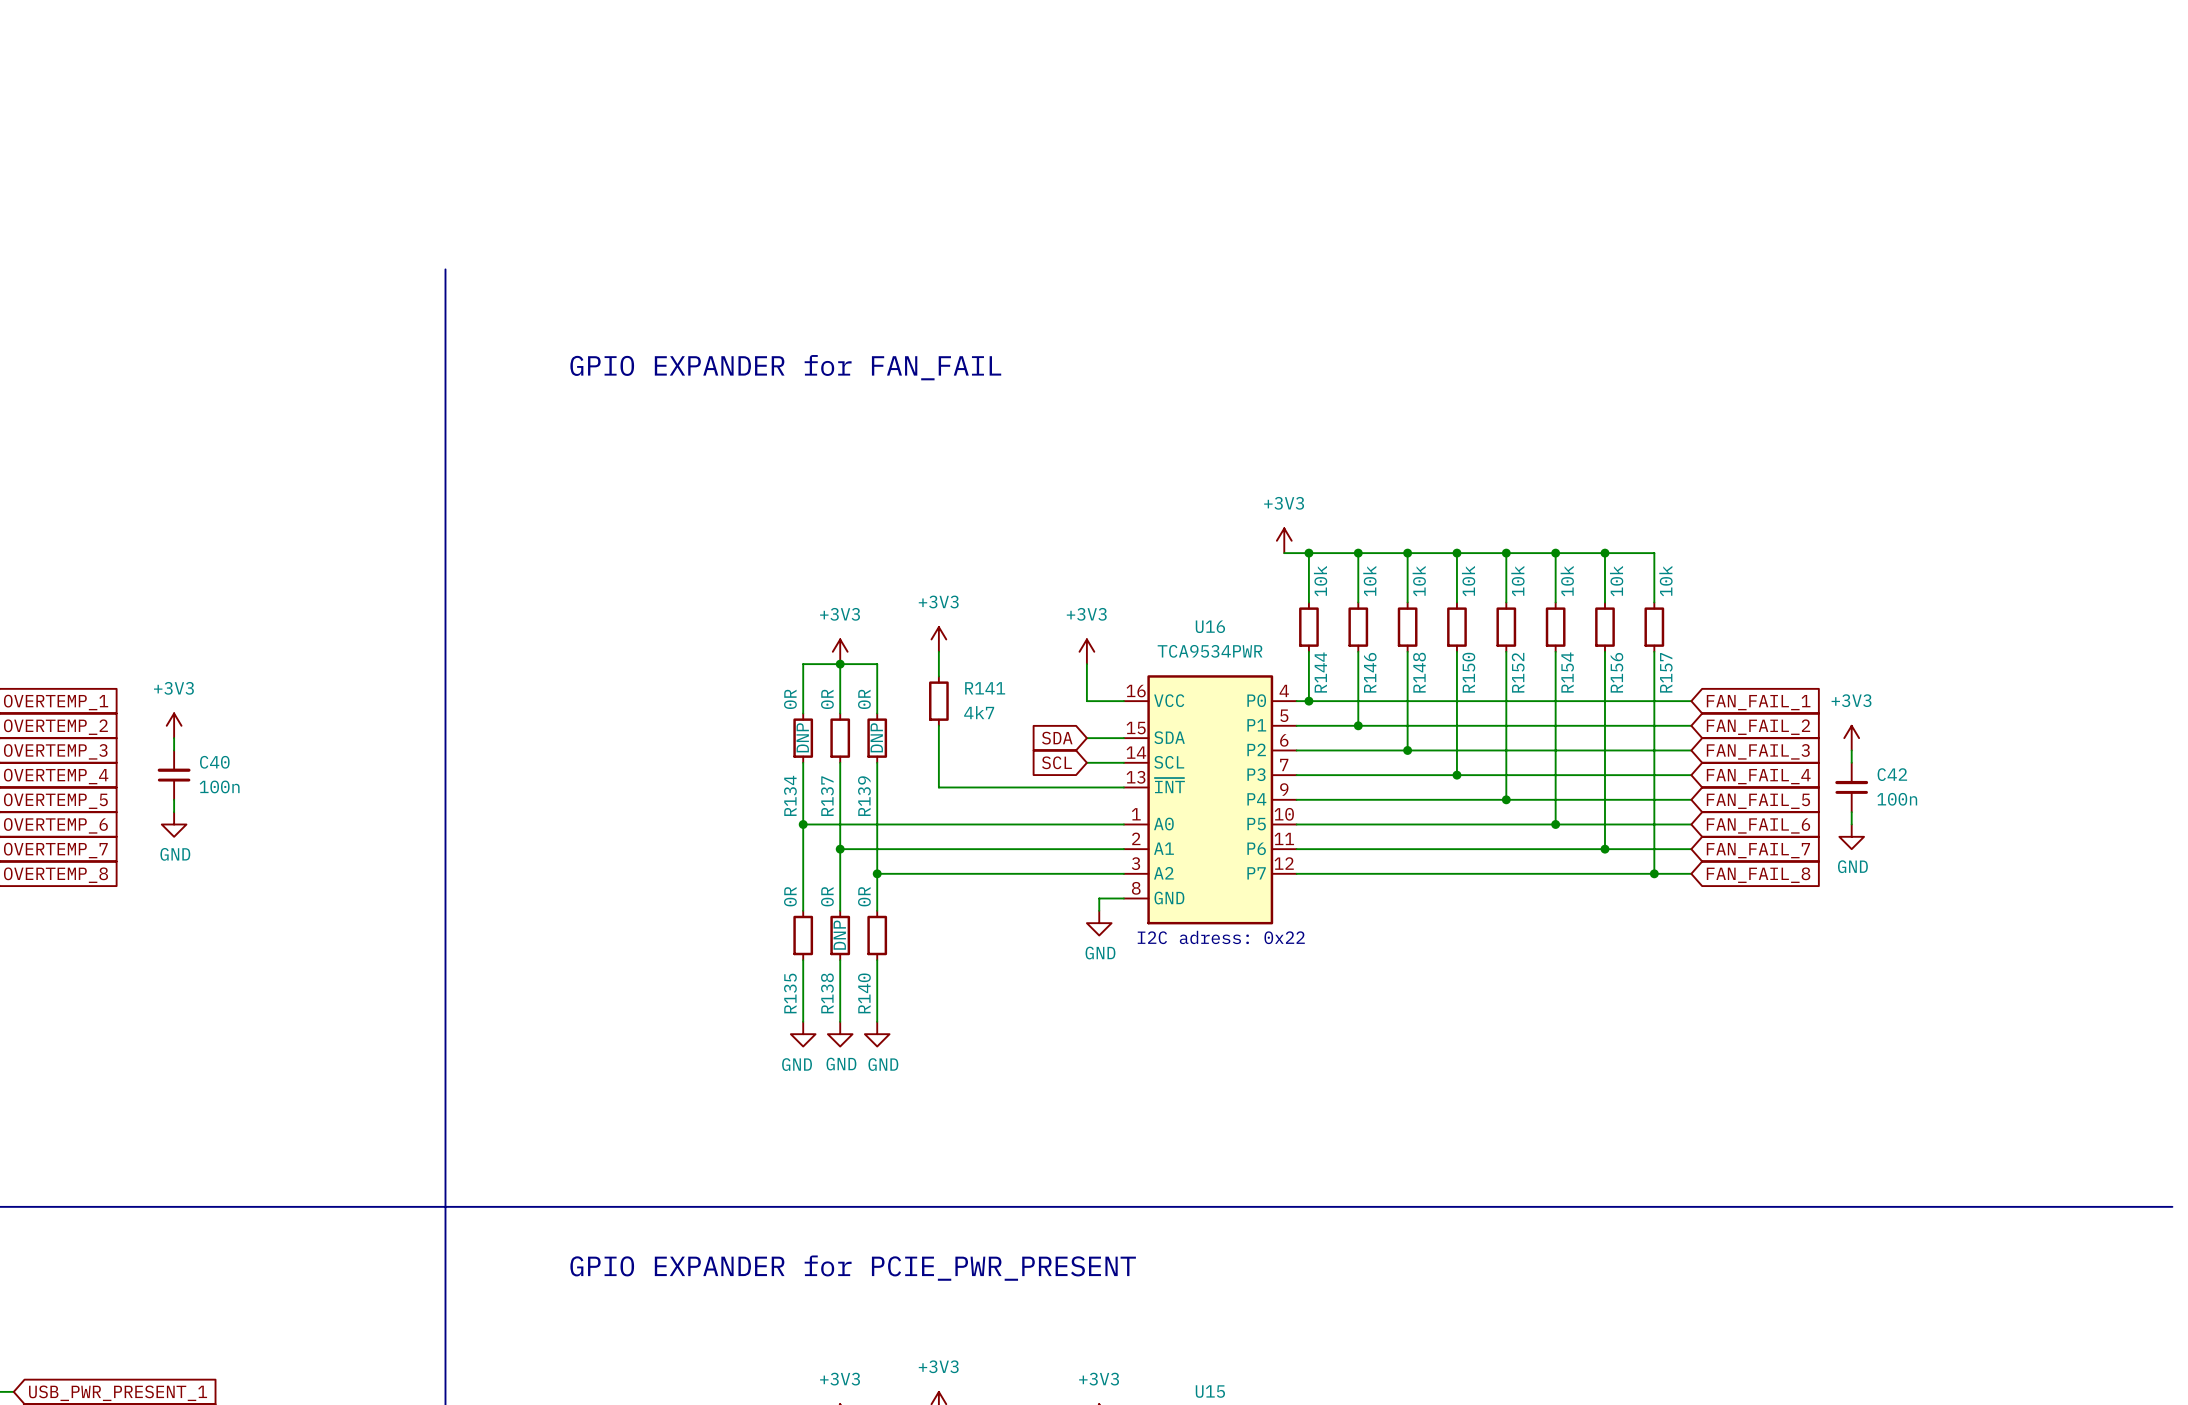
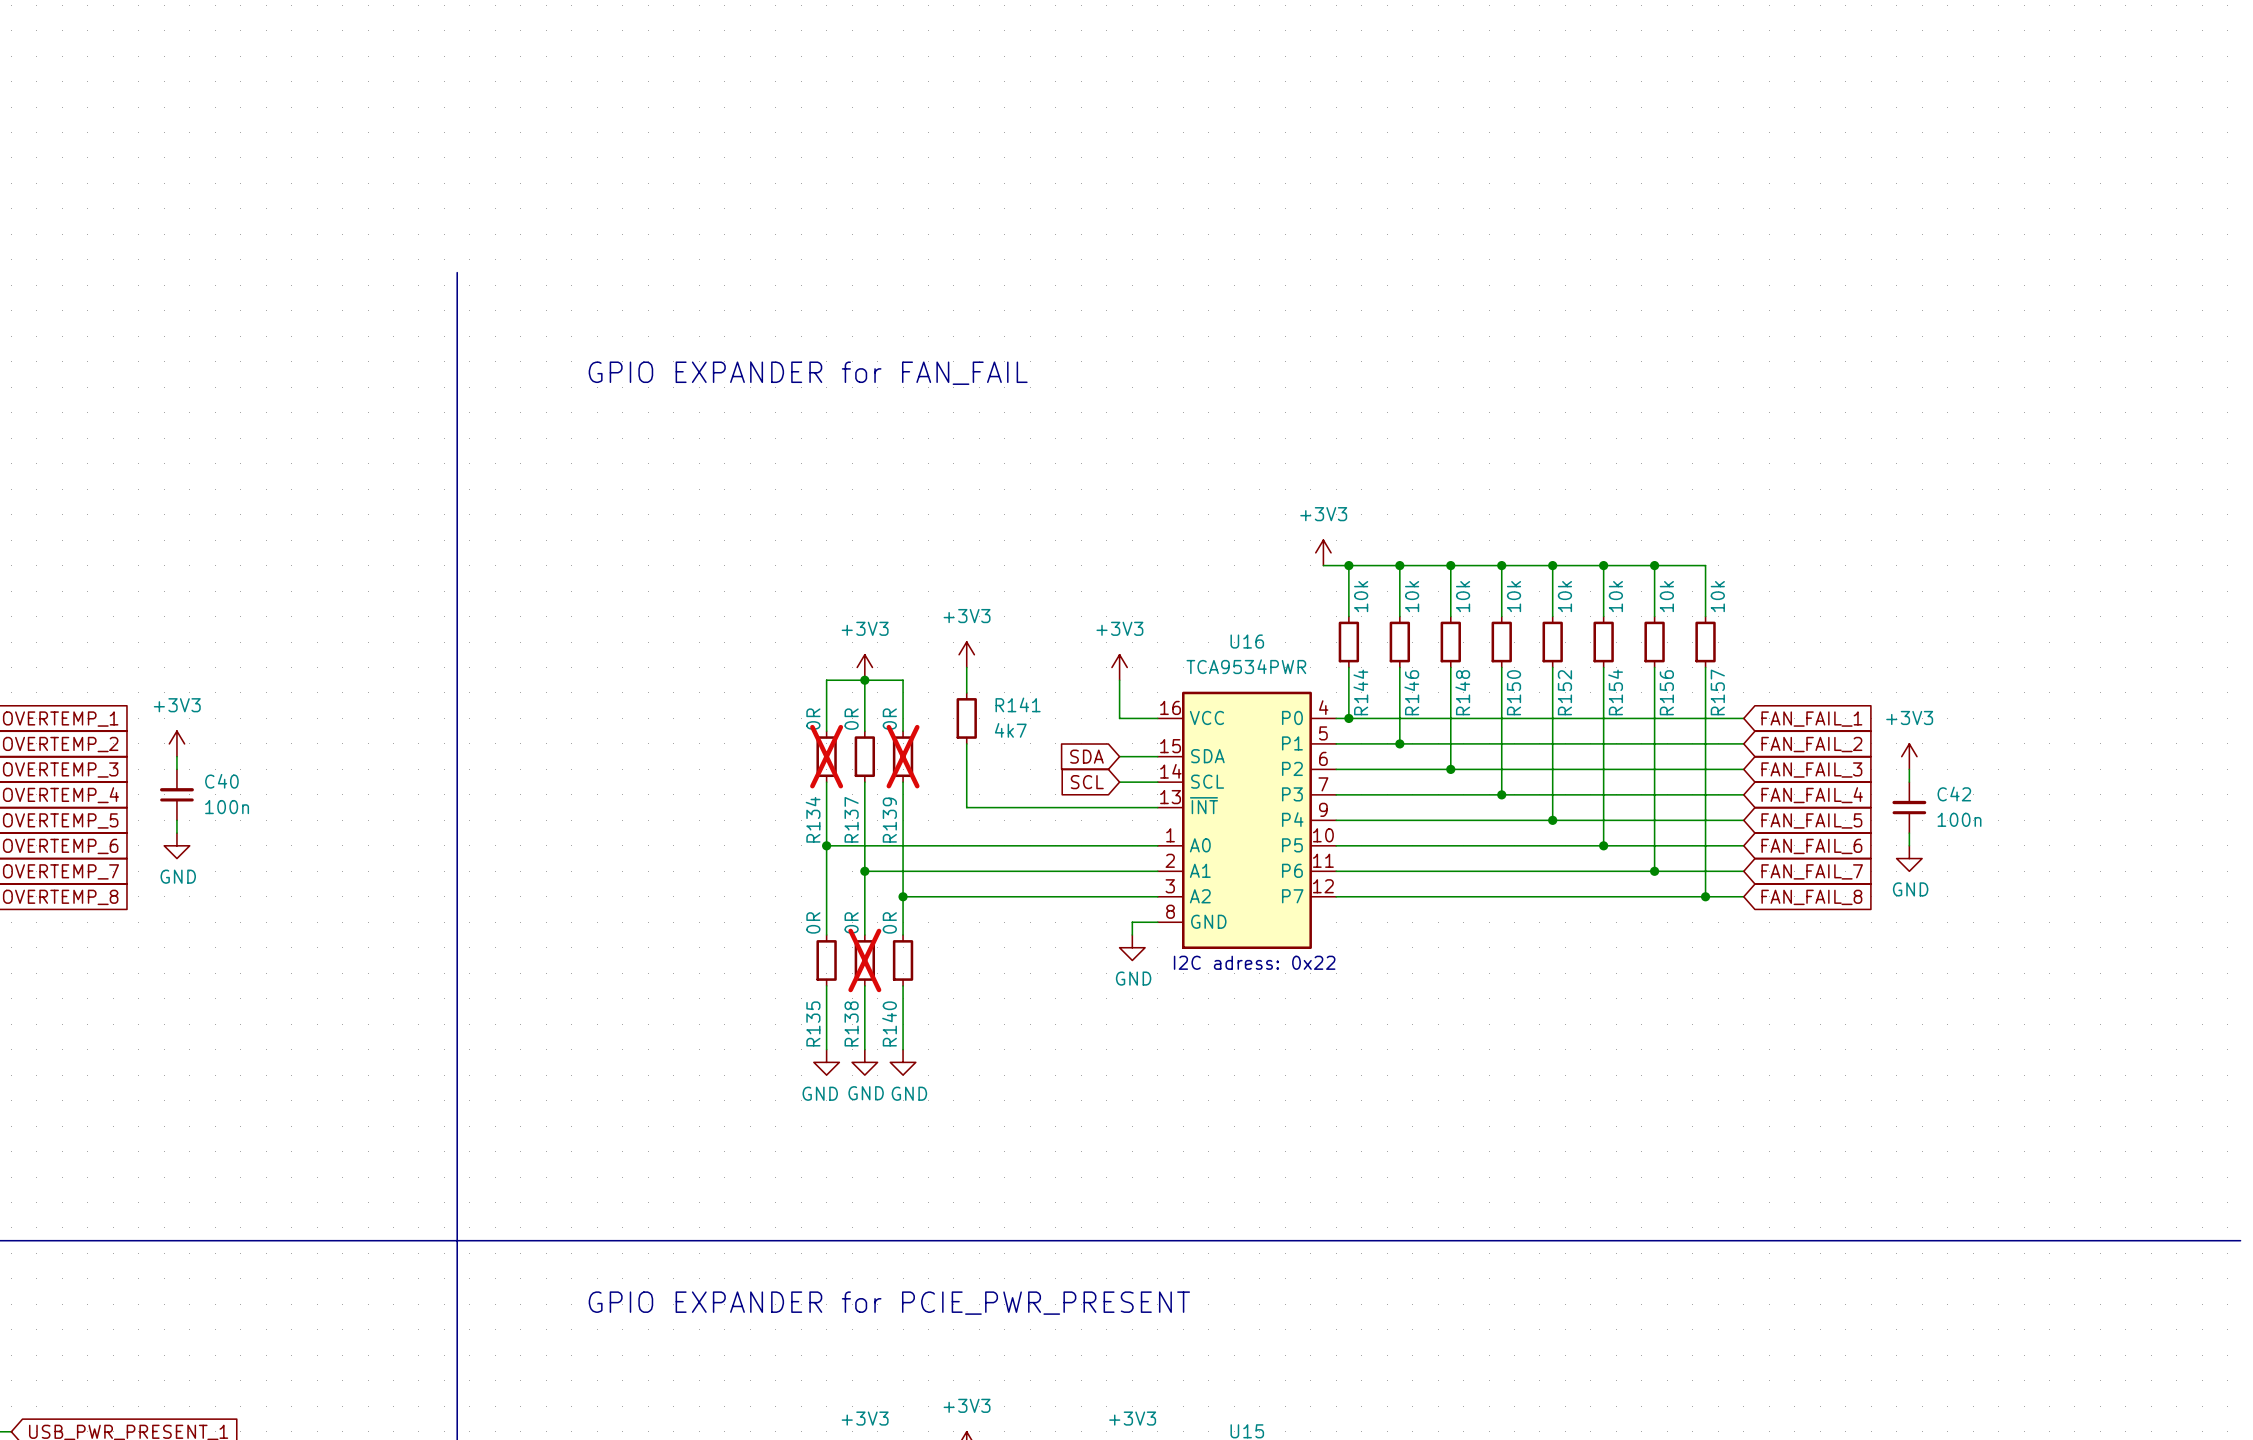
R134 text: DNP (802, 737) -> none
R139 text: DNP (876, 737) -> none
R134 do-not-place cross: none -> (826, 756)
R139 do-not-place cross: none -> (903, 756)
R138 text: DNP (839, 935) -> none
R138 do-not-place cross: none -> (864, 960)

